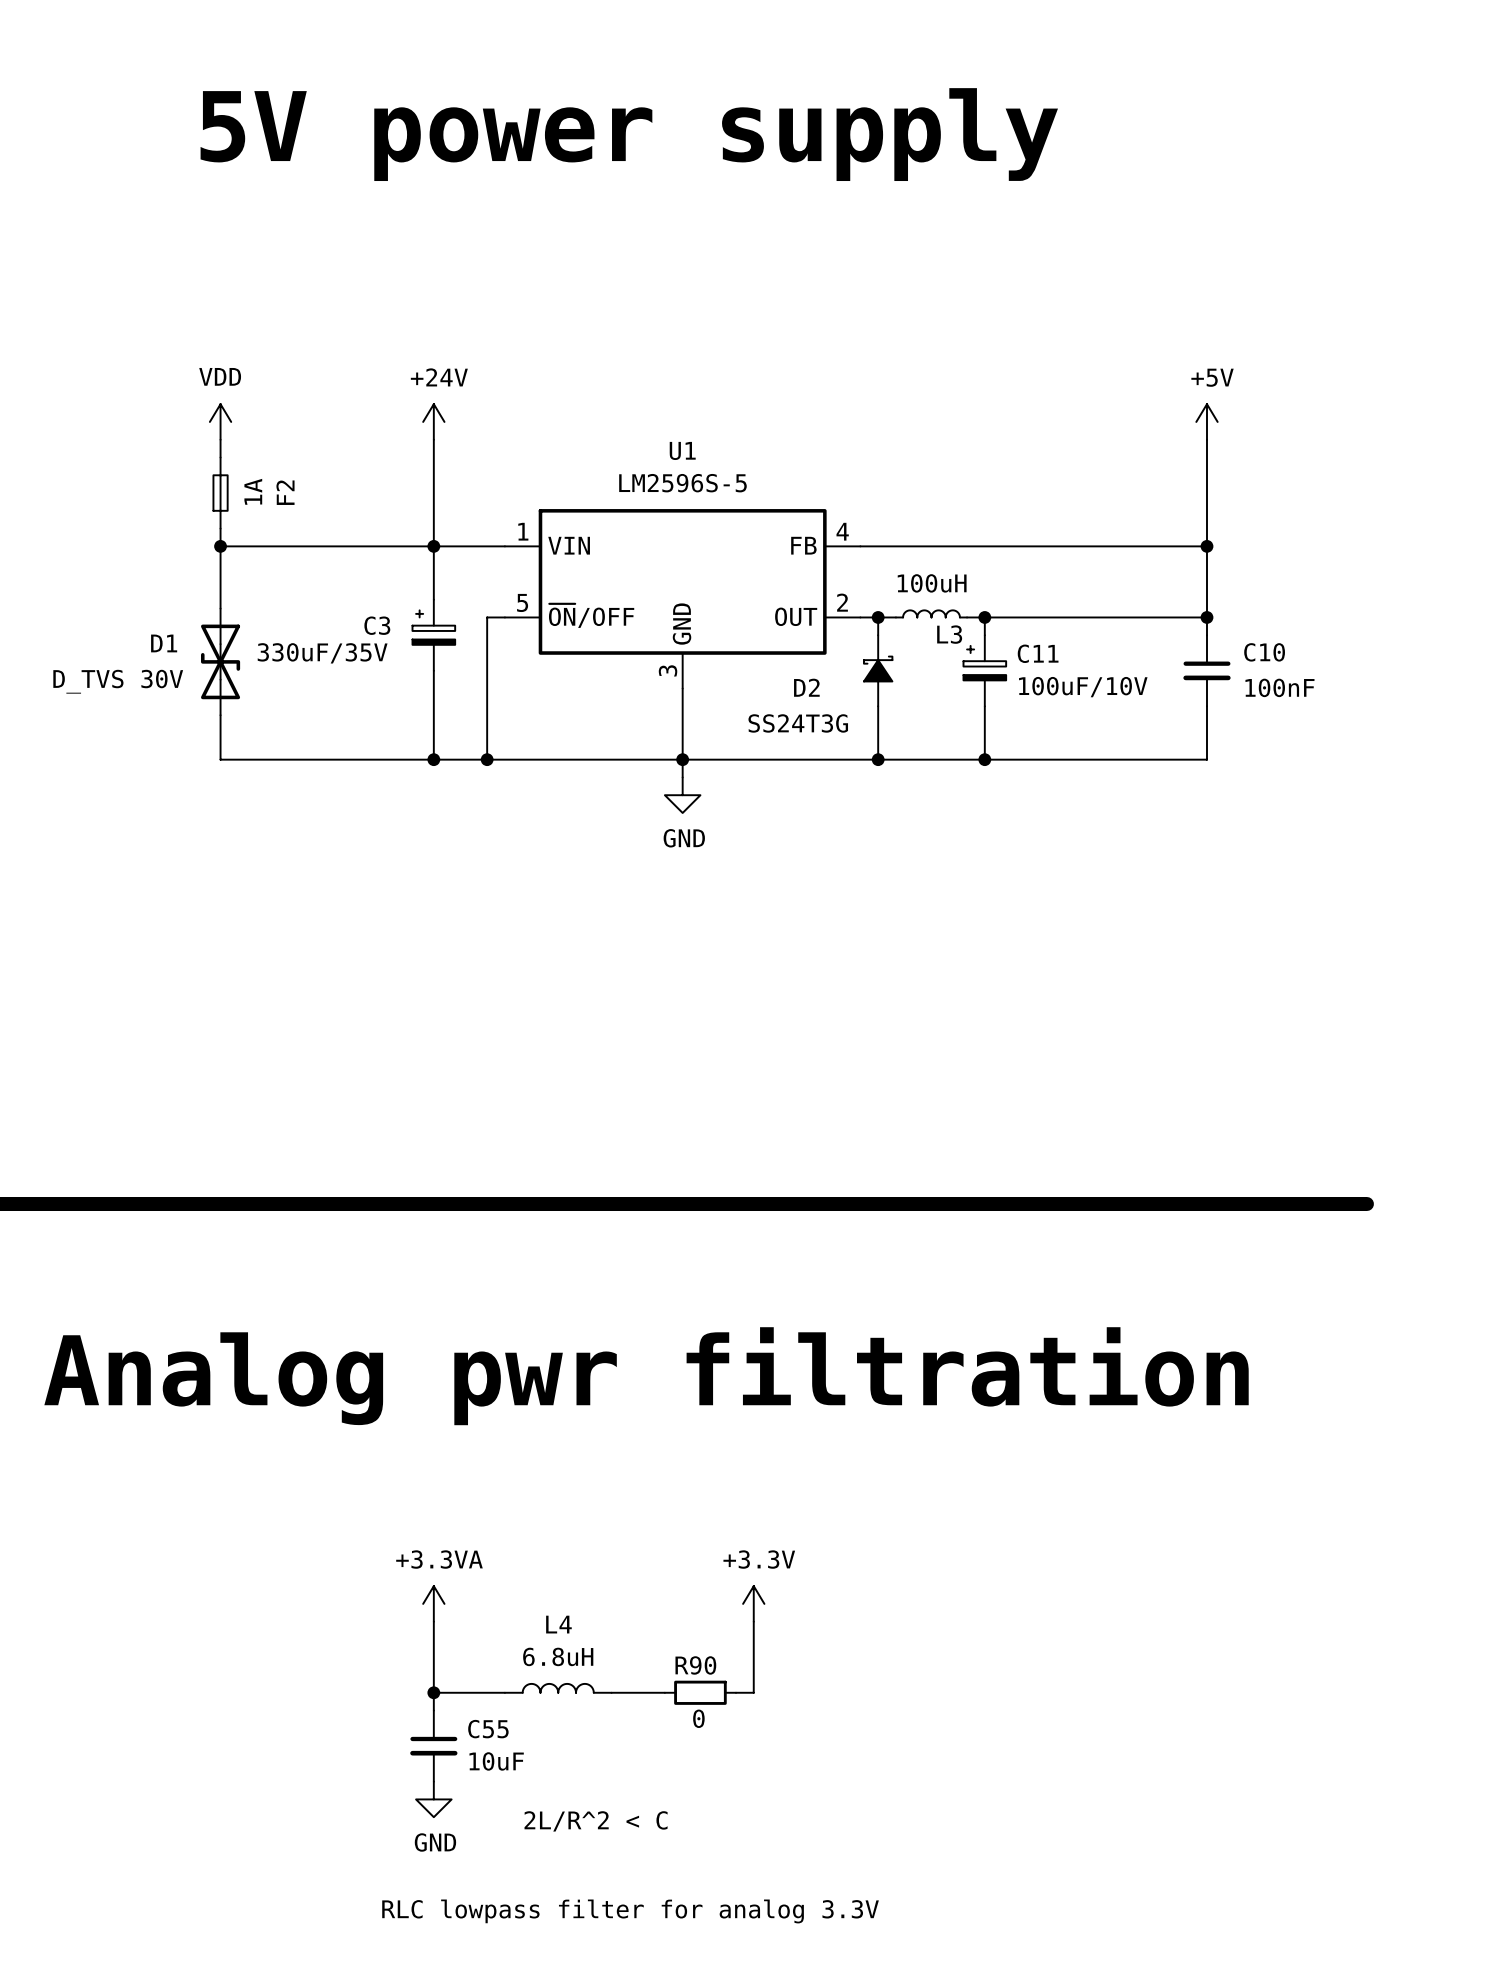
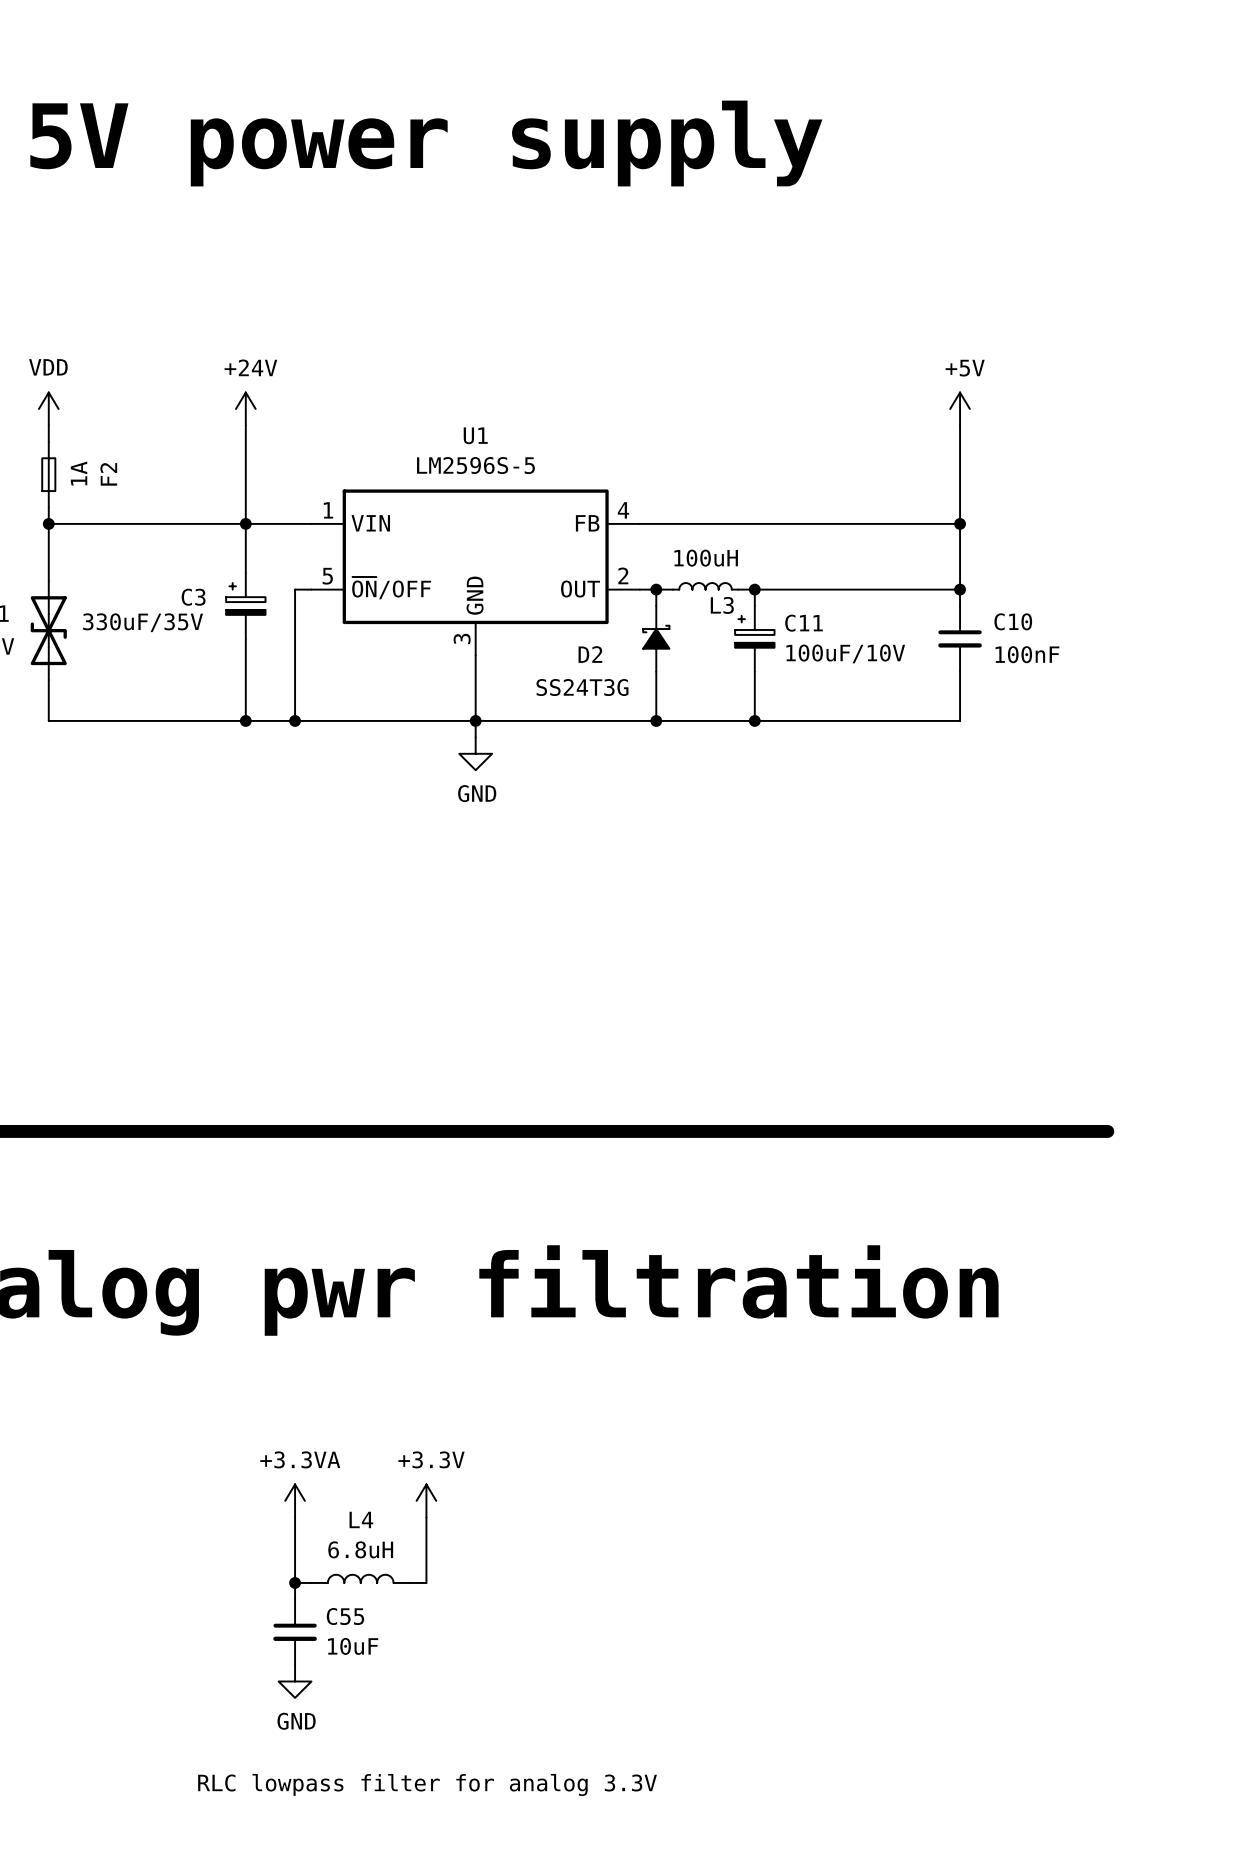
power symbol position: +3.3VA (433, 1603) -> +3.3VA (295, 1500)
power symbol position: +3.3V (753, 1603) -> +3.3V (426, 1500)
wire: (433, 1621) (433, 1710) -> (295, 1517) (295, 1599)
wire: (753, 1621) (753, 1692) (735, 1692) -> none
wire: (433, 1692) (487, 1692) -> none
junction position: (433, 1692) -> (295, 1582)
wire: (629, 1692) (664, 1692) -> (426, 1582) (426, 1517)
R90: 0 (700, 1692) -> none
C55 position: (433, 1746) -> (295, 1632)
power symbol position: GND (433, 1799) -> GND (295, 1681)
text: 2L/R^2 < C (596, 1821) -> none

